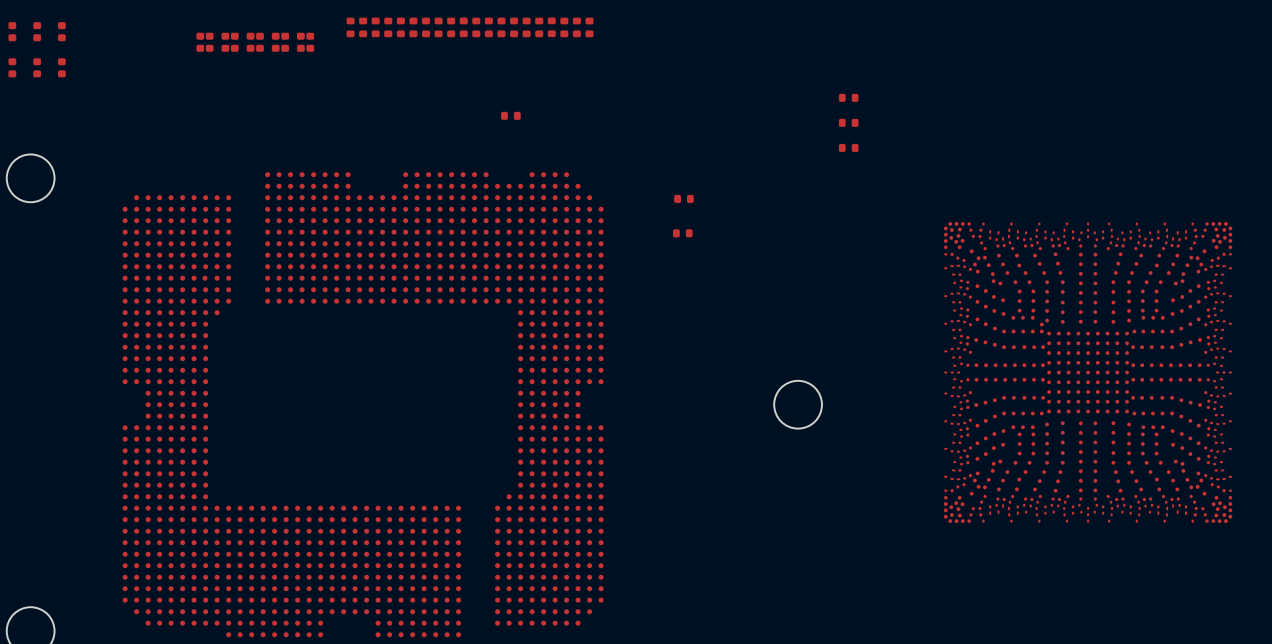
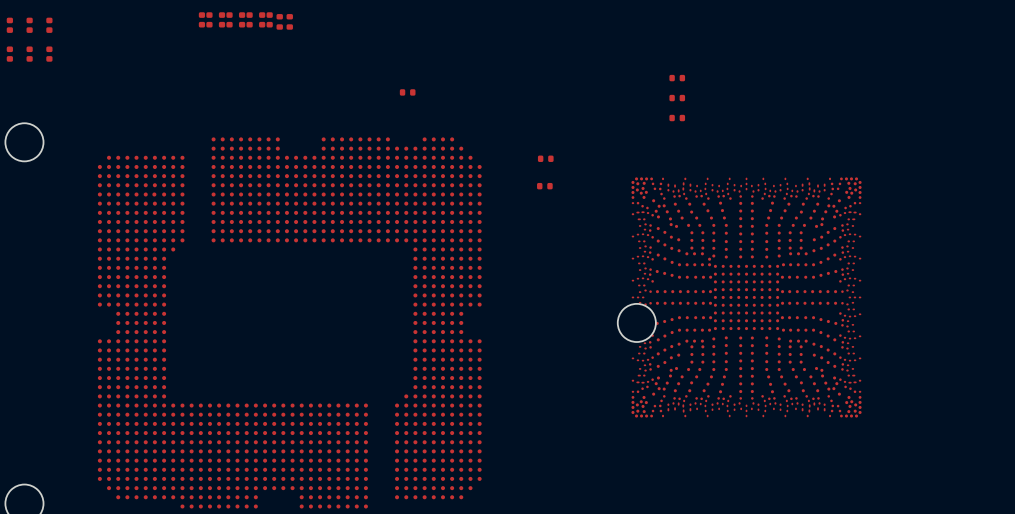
part: none -> (201, 19)
part: none -> (209, 19)
part: none -> (222, 19)
part: none -> (229, 19)
part: none -> (242, 19)
part: none -> (249, 19)
part: none -> (262, 19)
part: none -> (269, 19)
part: (375, 27) -> none
part: (388, 27) -> none
part: (400, 27) -> none
part: (413, 27) -> none
part: (426, 27) -> none
part: (438, 27) -> none
part: (451, 27) -> none
part: (463, 27) -> none
part: (476, 27) -> none
part: (488, 27) -> none
part: (501, 27) -> none
part: (514, 27) -> none
part: (526, 27) -> none
part: (539, 27) -> none
part: (551, 27) -> none
part: (564, 27) -> none
part: (576, 27) -> none
part: (589, 27) -> none
part: (200, 42) -> none
part: (209, 42) -> none
part: (225, 42) -> none
part: (234, 42) -> none
part: (250, 42) -> none
part: (259, 42) -> none
part: (275, 42) -> none
part: (285, 42) -> none
part: (300, 42) -> none
part: (310, 42) -> none
part position: (1088, 372) -> (746, 297)

